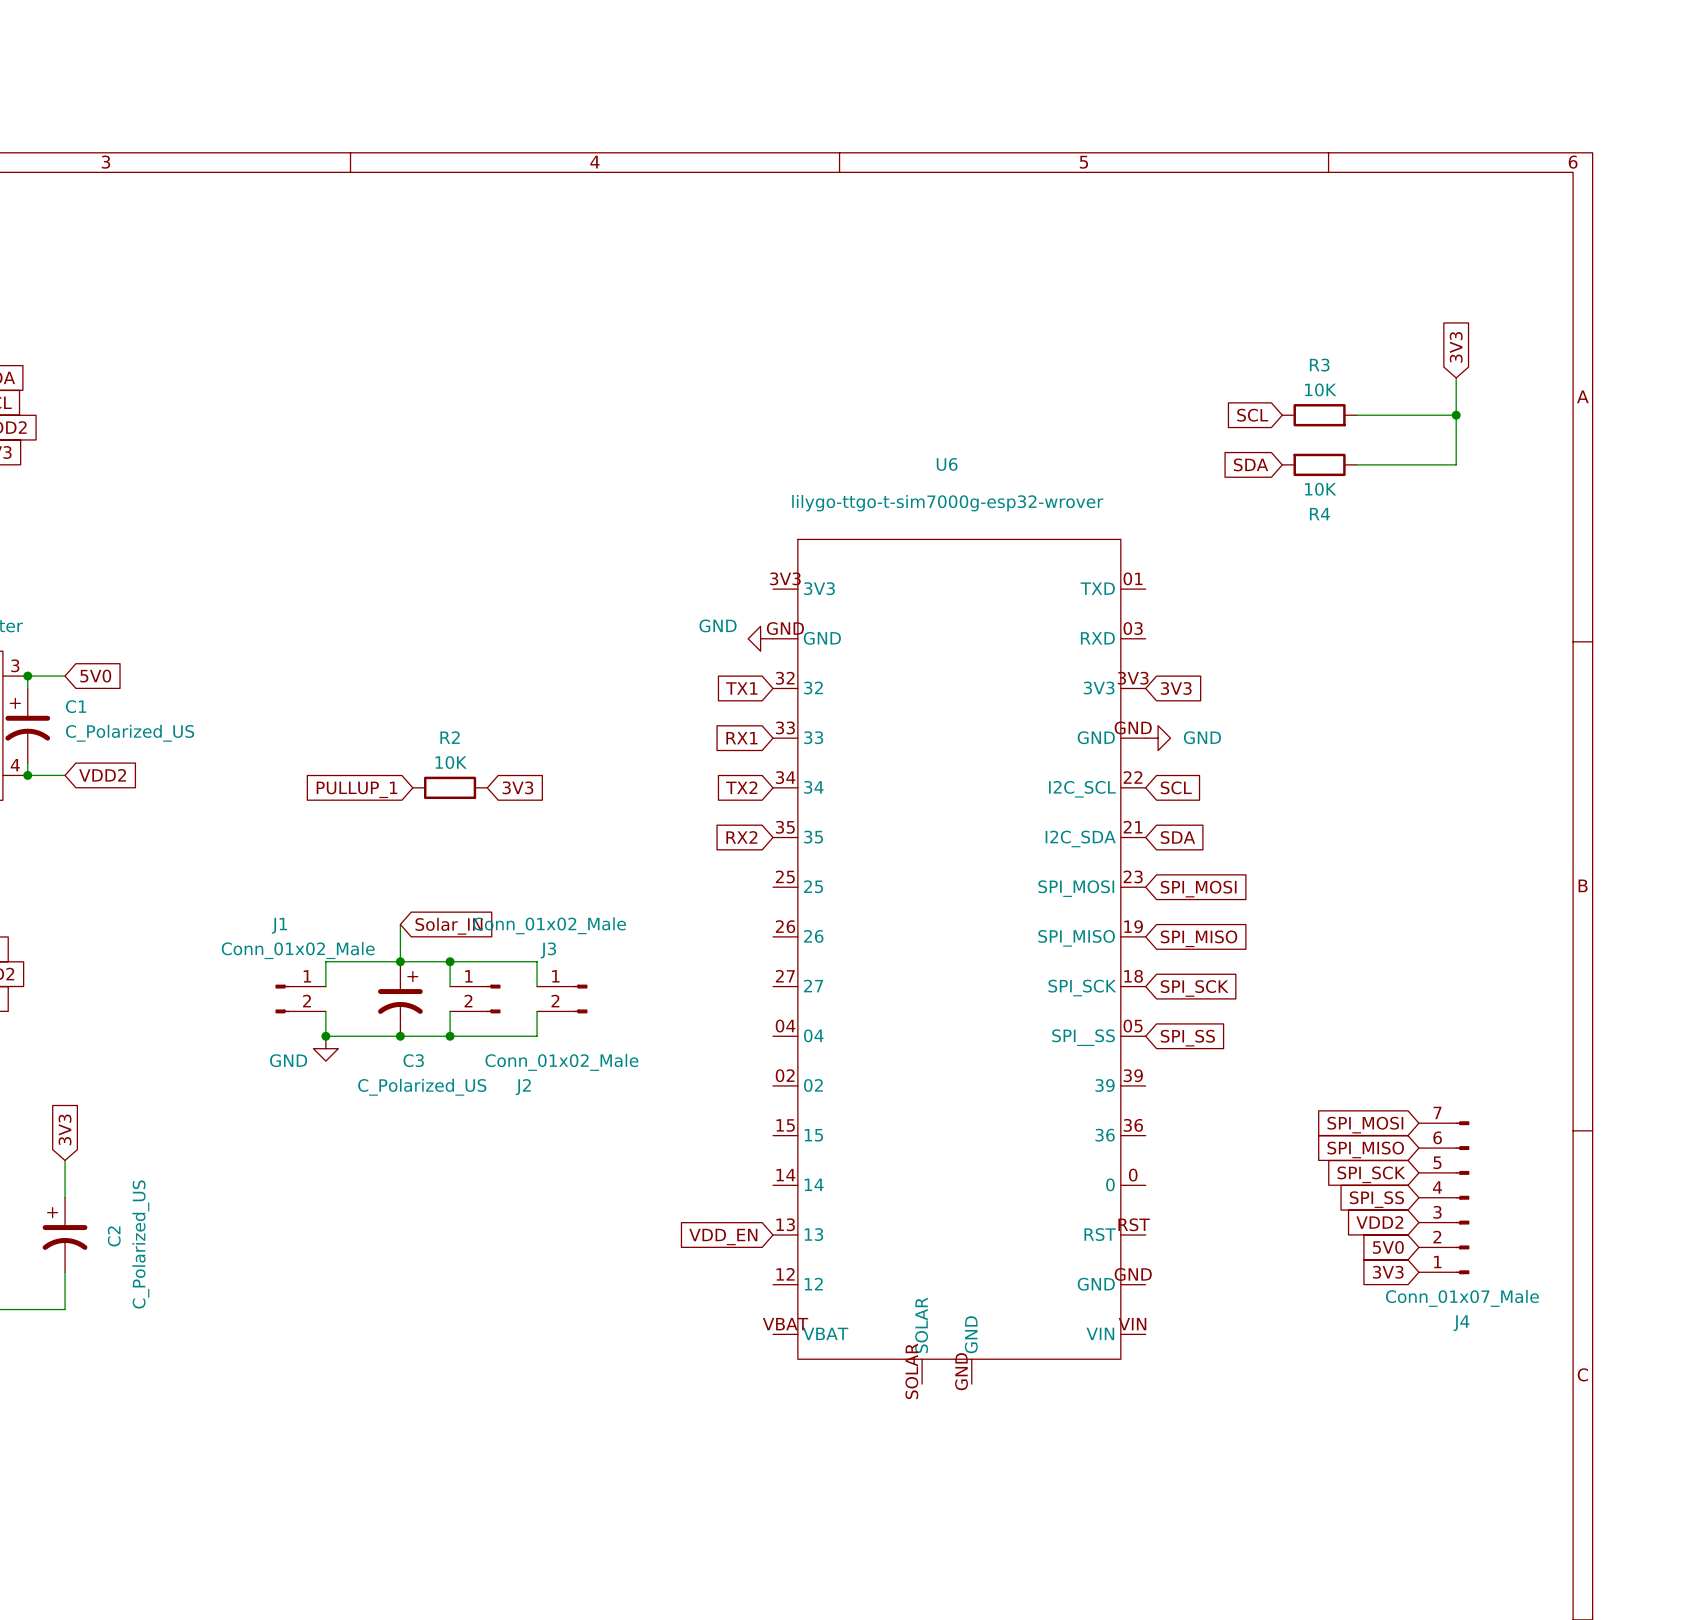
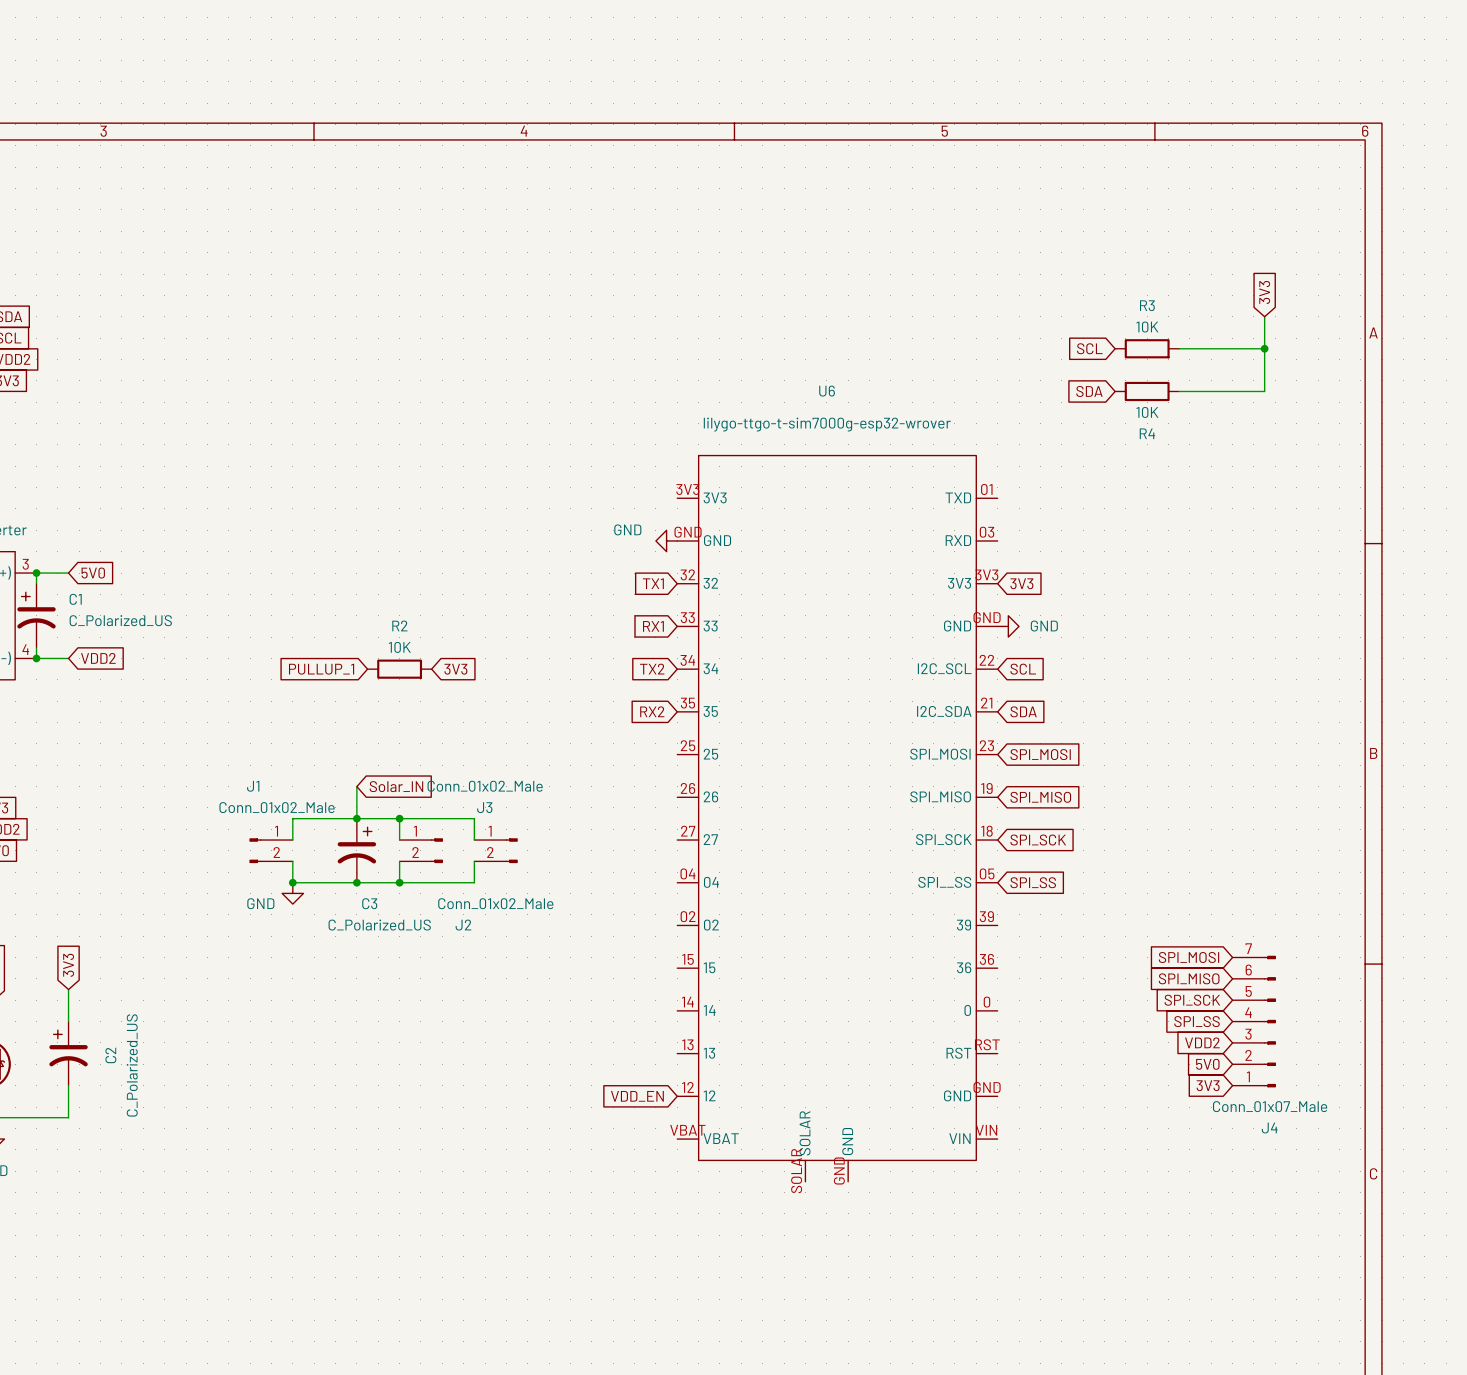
global label position: VDD_EN (723, 1237) -> VDD_EN (637, 1096)

